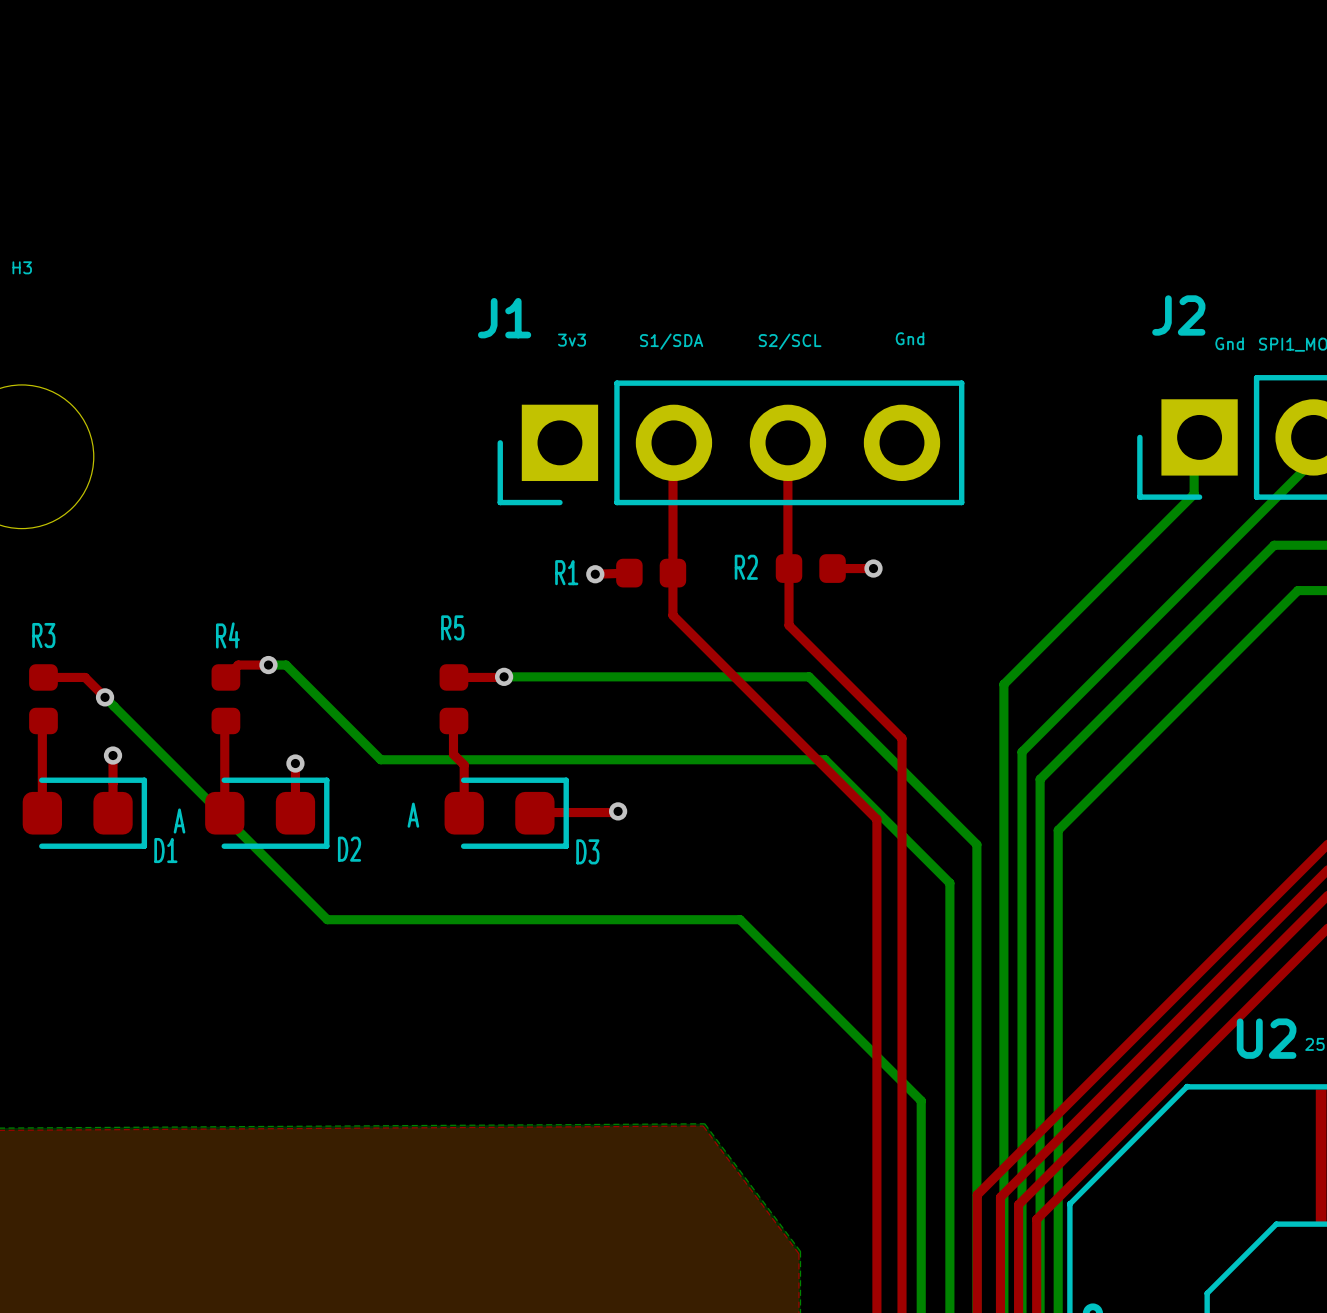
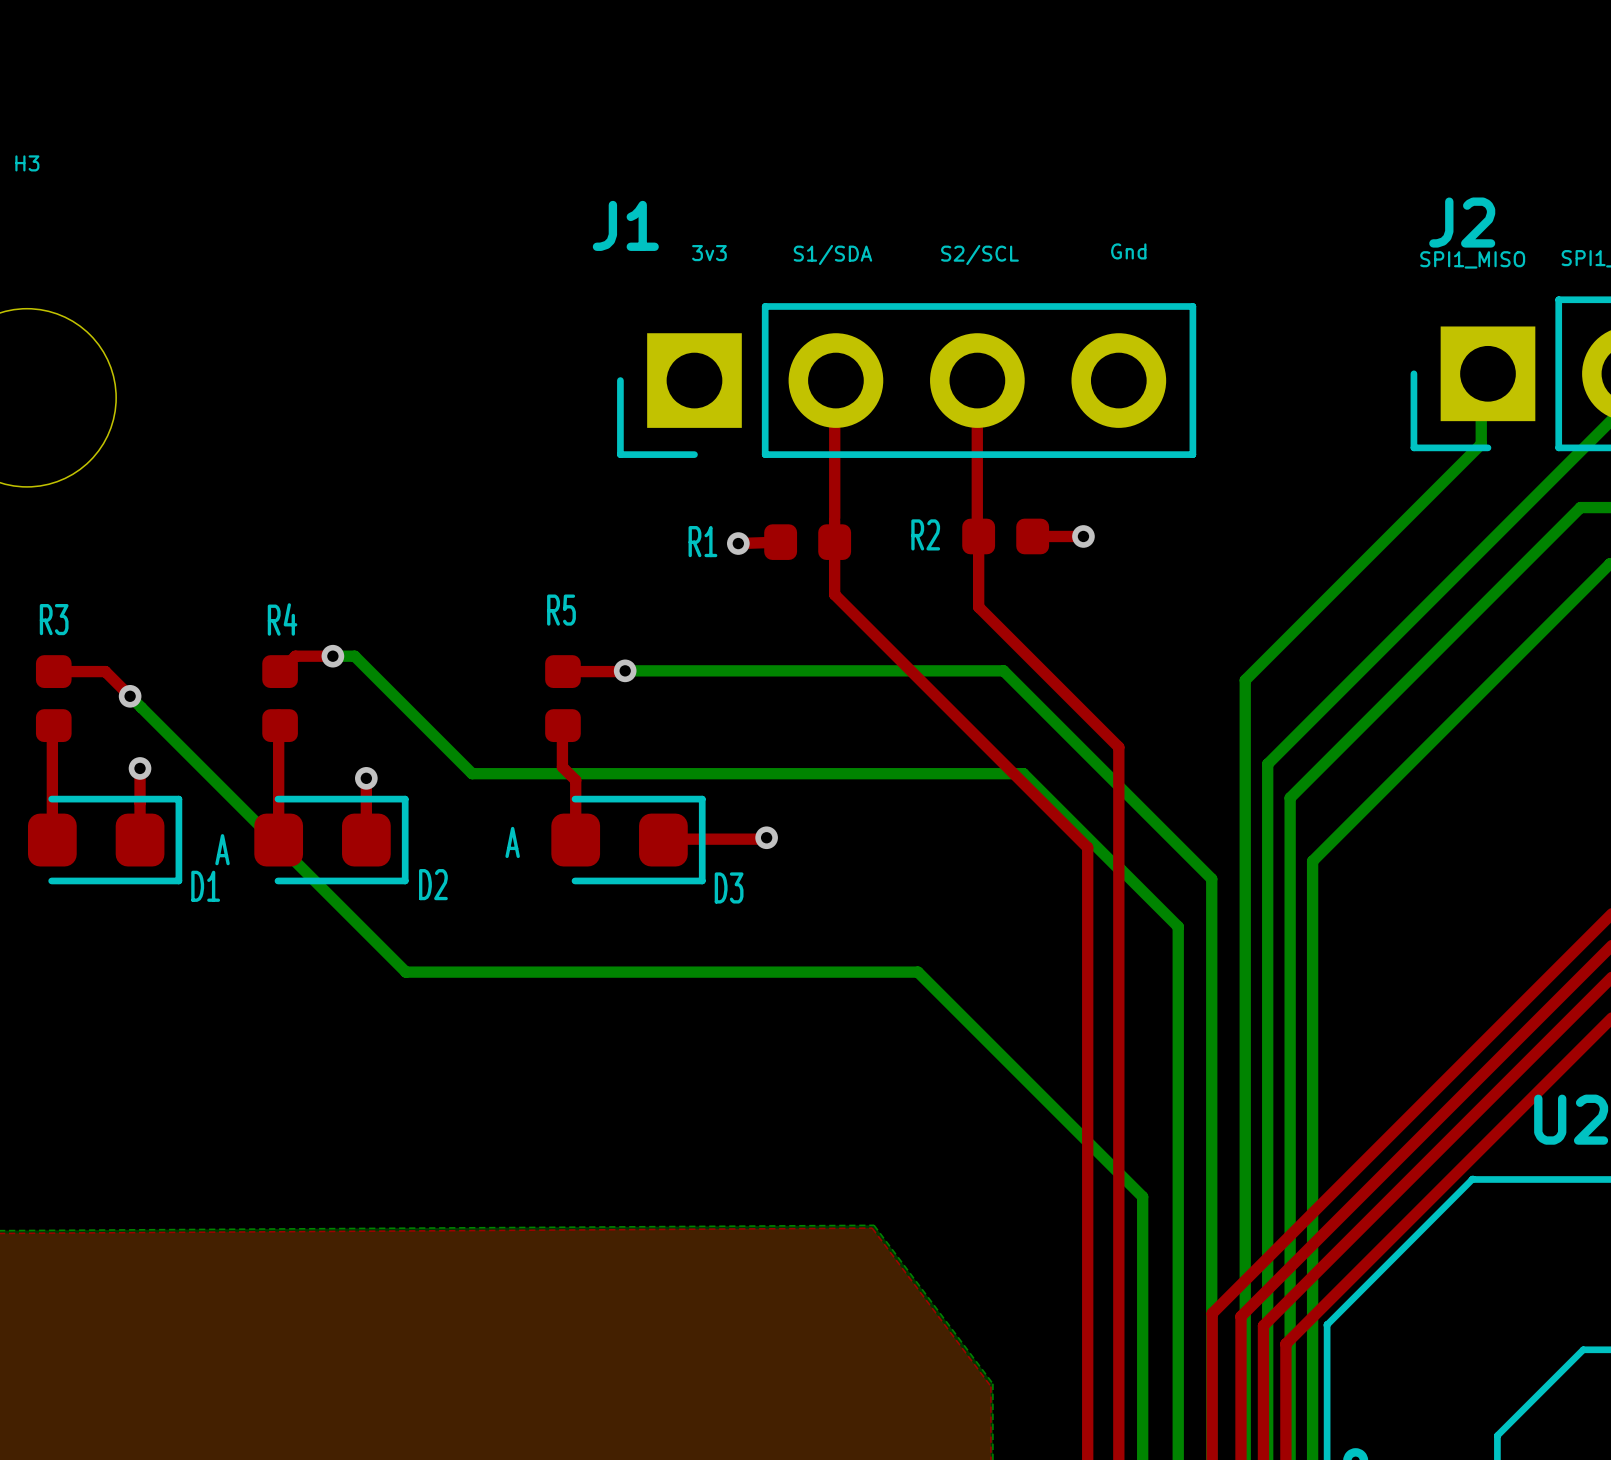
text: Gnd (1229, 343) -> SPI1_MISO (1472, 259)

